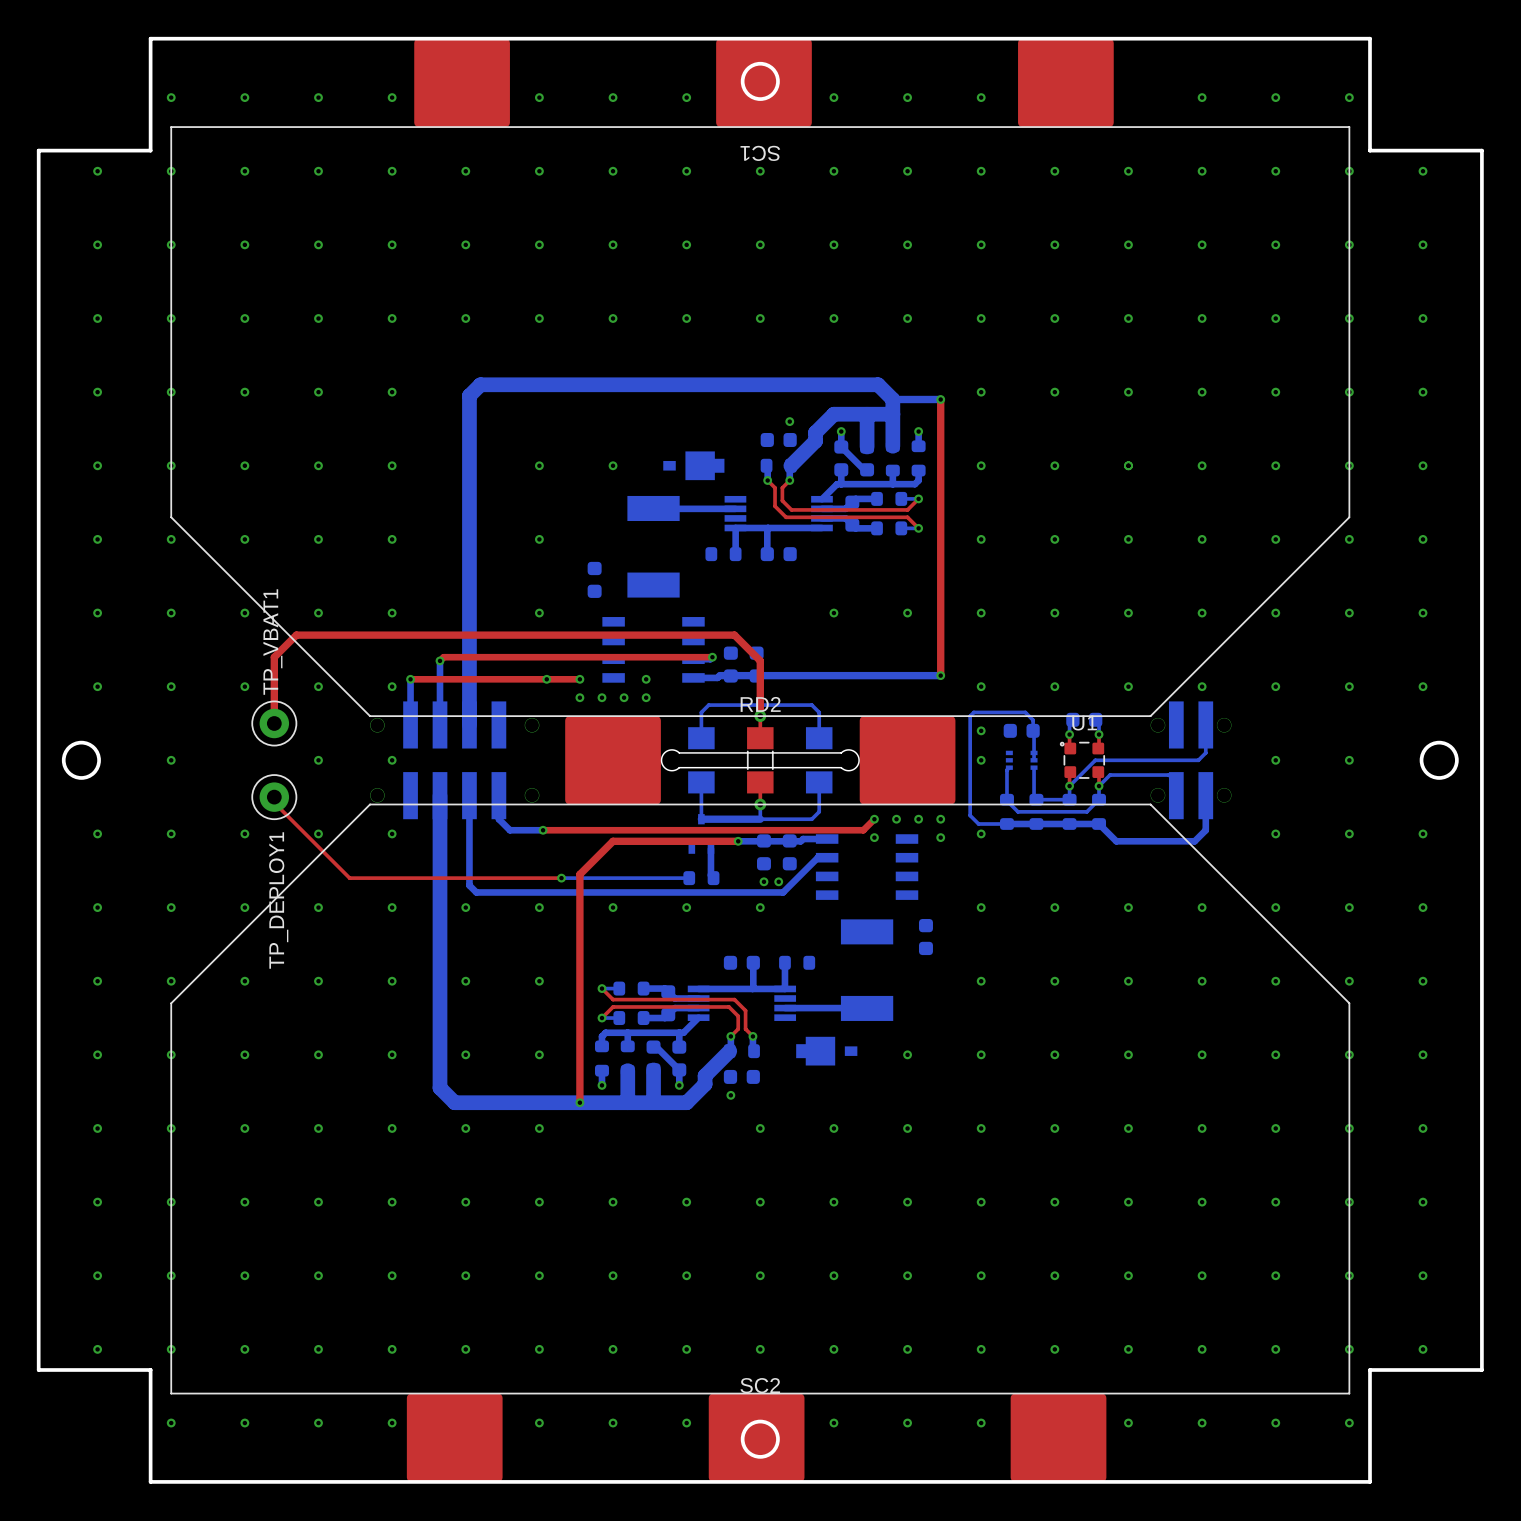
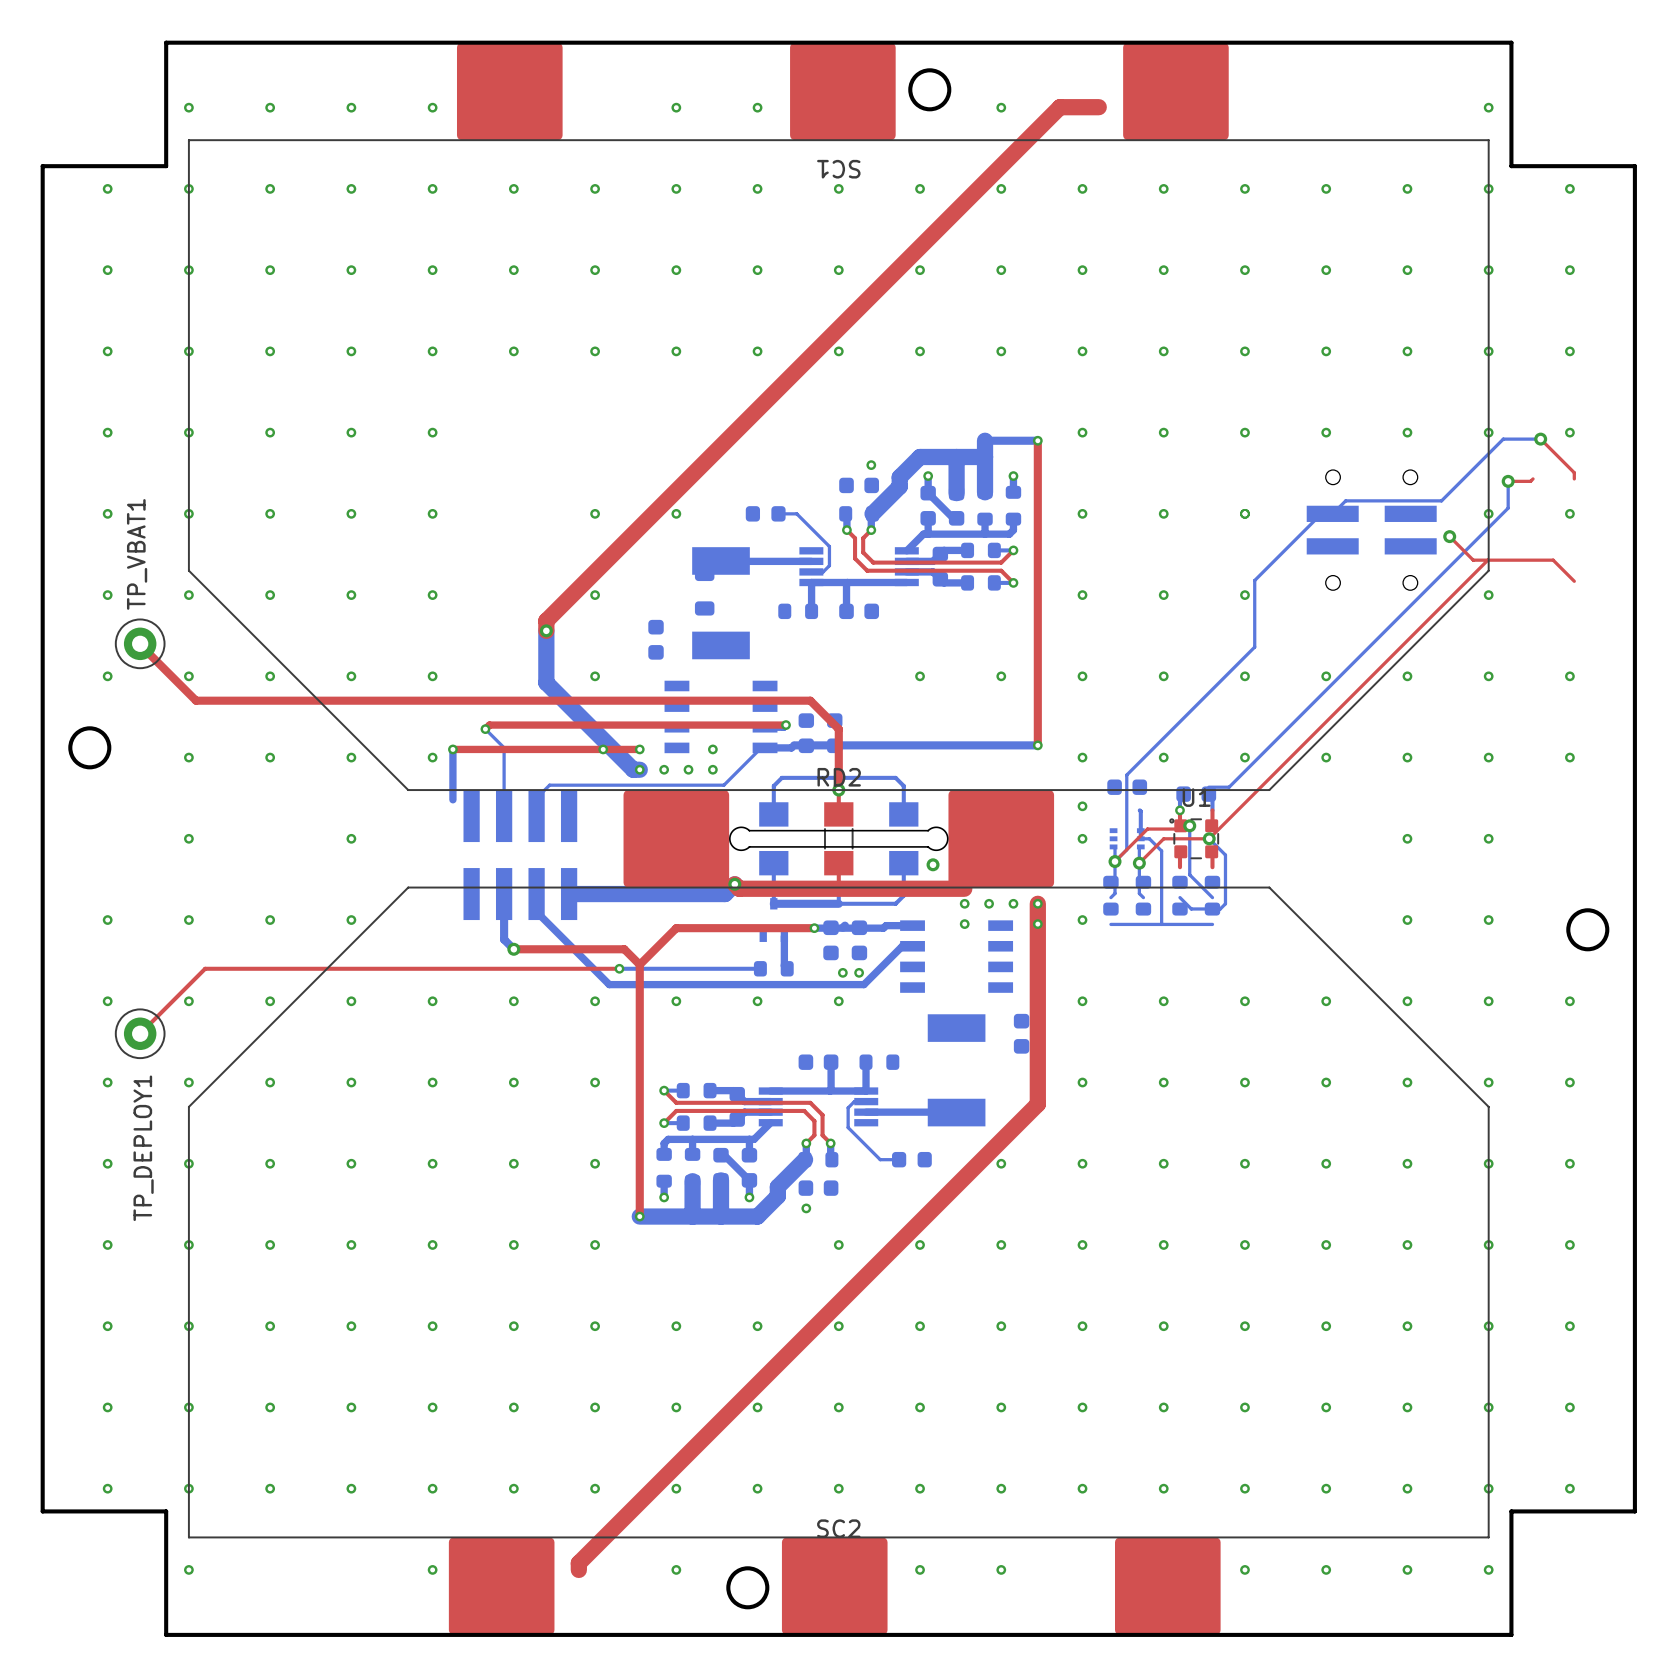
drawing shape: [36, 36, 1484, 1484] -> [40, 40, 1637, 1637]
via: (539, 97) -> none
via: (833, 97) -> none
via: (981, 97) -> none
top track: none -> (1098, 107) (1060, 107) (546, 620) (546, 630)
via: (1202, 97) -> none
via: (1275, 97) -> none
top track: none -> (1540, 439) (1574, 472) (1574, 478)
bottom track: none -> (1540, 439) (1503, 439) (1441, 500) (1345, 500) (1332, 513) (1321, 513) (1254, 580) (1254, 647) (1126, 775) (1126, 849) (1115, 861)
via: none -> (1540, 439)
bottom track: (892, 399) (878, 384) (480, 384) (469, 395) (469, 724) -> none
top track: none -> (1533, 478) (1530, 481) (1508, 481)
bottom track: none -> (1508, 481) (1508, 508) (1229, 787) (1208, 787)
via: none -> (1508, 481)
part footprint: [663, 451, 725, 481] -> [745, 506, 786, 522]
bottom track: none -> (778, 513) (796, 513) (829, 546) (829, 565) (823, 571) (812, 571)
via: (1202, 465) -> none
via: (1275, 465) -> none
part: none -> (1371, 530)
top track: none -> (1449, 536) (1473, 560) (1553, 560) (1574, 581)
via: none -> (1449, 536)
top track: none -> (1487, 560) (1209, 838) (1163, 838) (1139, 863)
part: none -> (704, 591)
via: (1202, 539) -> none
via: (1275, 539) -> none
via: (1423, 539) -> none
bottom track: none -> (546, 630) (546, 682) (633, 769) (639, 769)
via: none -> (546, 630)
top track: (296, 635) (274, 657) (274, 723) -> (327, 700) (196, 700) (140, 643)
bottom track: (440, 660) (440, 724) -> (485, 729) (504, 747) (504, 816)
bottom track: none -> (761, 747) (723, 785) (549, 785) (536, 798) (536, 816)
via: (97, 686) -> none
TP_VBAT1 position: (274, 723) -> (140, 643)
bottom track: (1205, 724) (1205, 752) (1198, 760) (1095, 760) (1069, 786) (1069, 799) (1036, 799) (1034, 797) (1034, 767) -> none
part position: (1021, 730) -> (1127, 787)
bottom track: (1033, 730) (1033, 720) (1025, 712) (973, 712) (970, 716) (970, 815) (978, 824) (1099, 824) (1116, 841) (1194, 841) (1205, 830) (1205, 795) -> none
via: (1099, 734) -> none
top track: none -> (1189, 825) (1186, 829) (1147, 829) (1115, 861)
bottom track: none -> (1189, 825) (1189, 874) (1212, 897)
via: none -> (1189, 825)
via: (392, 760) -> none
part: (454, 760) -> none
bottom track: none -> (1139, 838) (1149, 838) (1161, 851) (1161, 924)
bottom track: none -> (1209, 838) (1225, 855) (1225, 903) (1220, 908) (1191, 908) (1179, 897)
via: none -> (1209, 838)
part: (1191, 760) -> none
bottom track: (1009, 767) (1006, 770) (1006, 800) (1018, 811) (1086, 811) (1099, 799) (1099, 786) (1110, 775) (1168, 775) (1176, 782) (1176, 795) -> none
bottom track: none -> (1115, 846) (1115, 893) (1110, 897)
bottom track: none -> (1139, 846) (1139, 893) (1143, 897)
part: none -> (520, 855)
via: none -> (1115, 861)
via: none -> (1139, 863)
via: none -> (933, 864)
via: (1069, 786) -> none
via: (1099, 786) -> none
bottom track: (440, 795) (440, 1087) (454, 1102) (579, 1102) -> none
bottom track: (469, 795) (469, 885) (476, 892) (552, 892) -> (536, 894) (536, 911) (609, 984)
bottom track: (498, 795) (498, 819) (509, 830) (543, 830) -> none
top track: (274, 797) (274, 802) (349, 878) -> (140, 1033) (205, 968) (385, 968)
TP_DEPLOY1 position: (274, 797) -> (140, 1033)
top track: none -> (734, 884) (739, 888) (964, 888)
bottom track: none -> (734, 884) (725, 894) (569, 894)
via: none -> (734, 884)
via: (760, 804) -> none
bottom track: none -> (504, 894) (504, 939) (513, 949)
top track: (874, 819) (863, 830) (543, 830) -> none
top track: none -> (1037, 903) (1037, 1104) (578, 1563) (578, 1569)
via: (543, 830) -> none
via: (392, 833) -> none
via: (1423, 833) -> none
bottom track: none -> (1110, 924) (1212, 924)
part: none -> (831, 940)
part: (763, 852) -> none
part: none -> (859, 940)
part: (789, 852) -> none
top track: none -> (513, 949) (624, 949) (639, 964)
via: none -> (513, 949)
bottom track: none -> (865, 1101) (854, 1101) (848, 1107) (848, 1127) (880, 1159) (899, 1159)
part footprint: [796, 1036, 858, 1066] -> [892, 1151, 932, 1168]
via: (244, 1423) -> none
via: (318, 1423) -> none
via: (539, 1423) -> none
via: (686, 1423) -> none
via: (981, 1423) -> none

